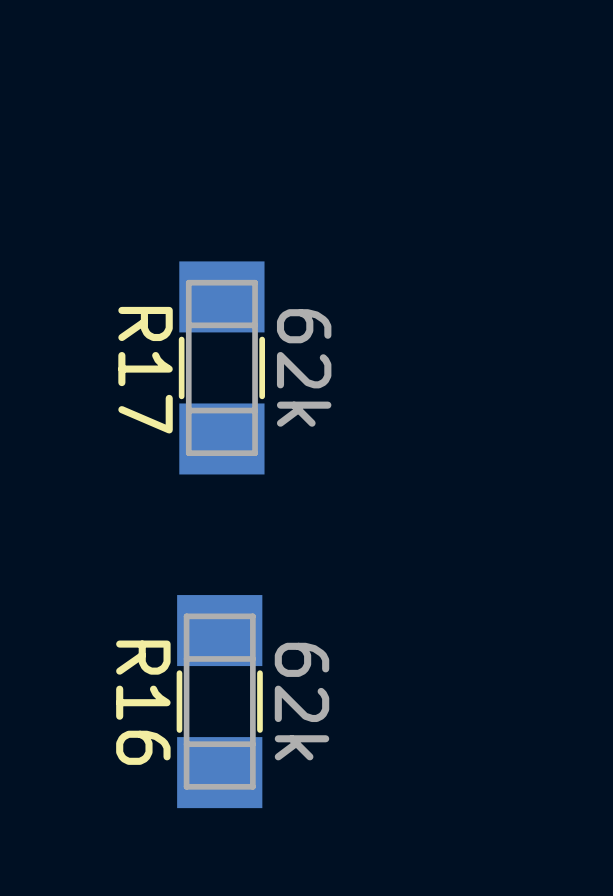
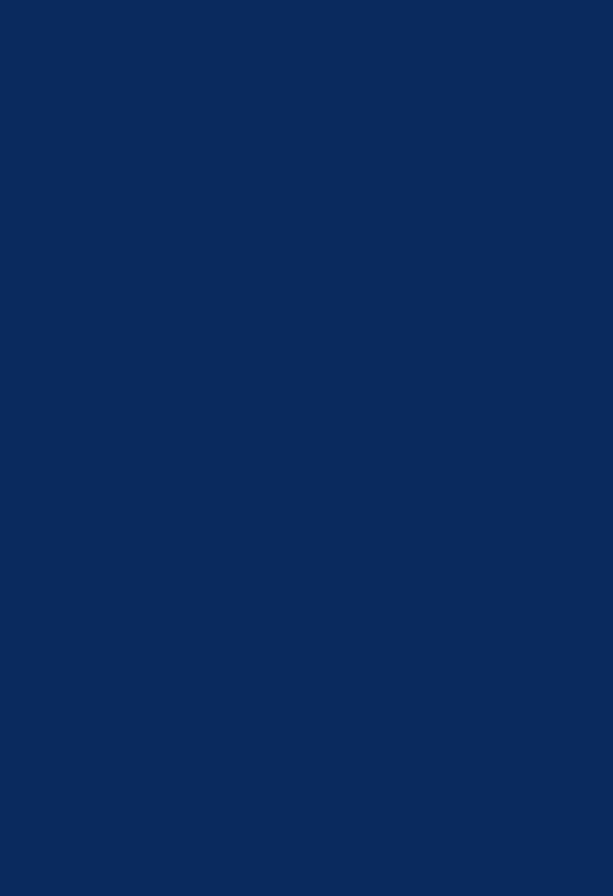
R17: 62k (221, 367) -> none
R16: 62k (219, 701) -> none

